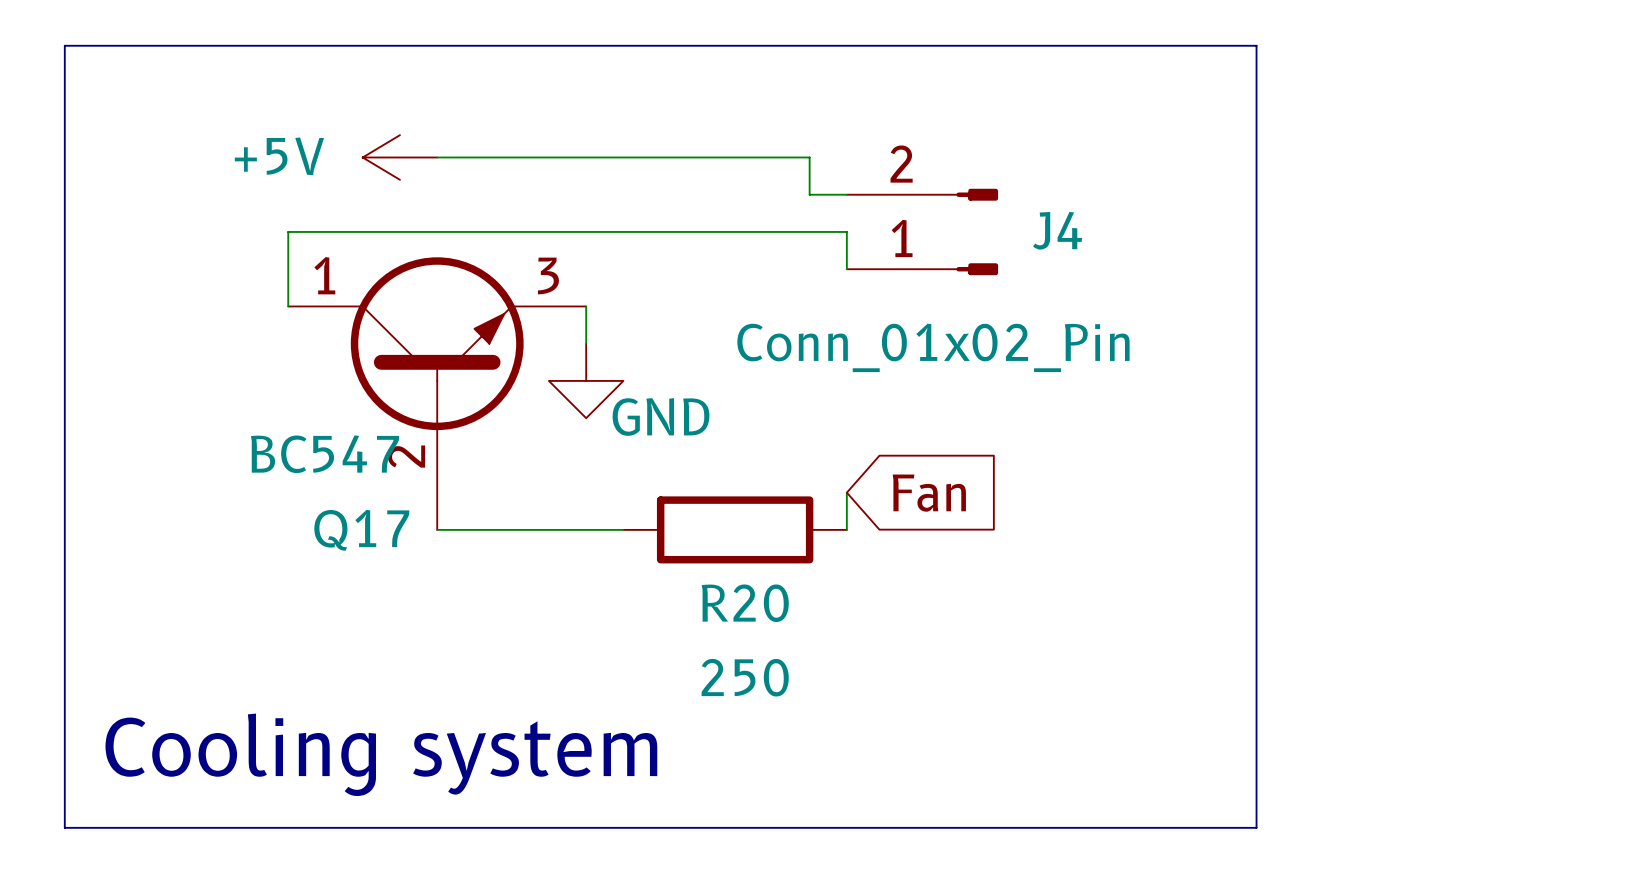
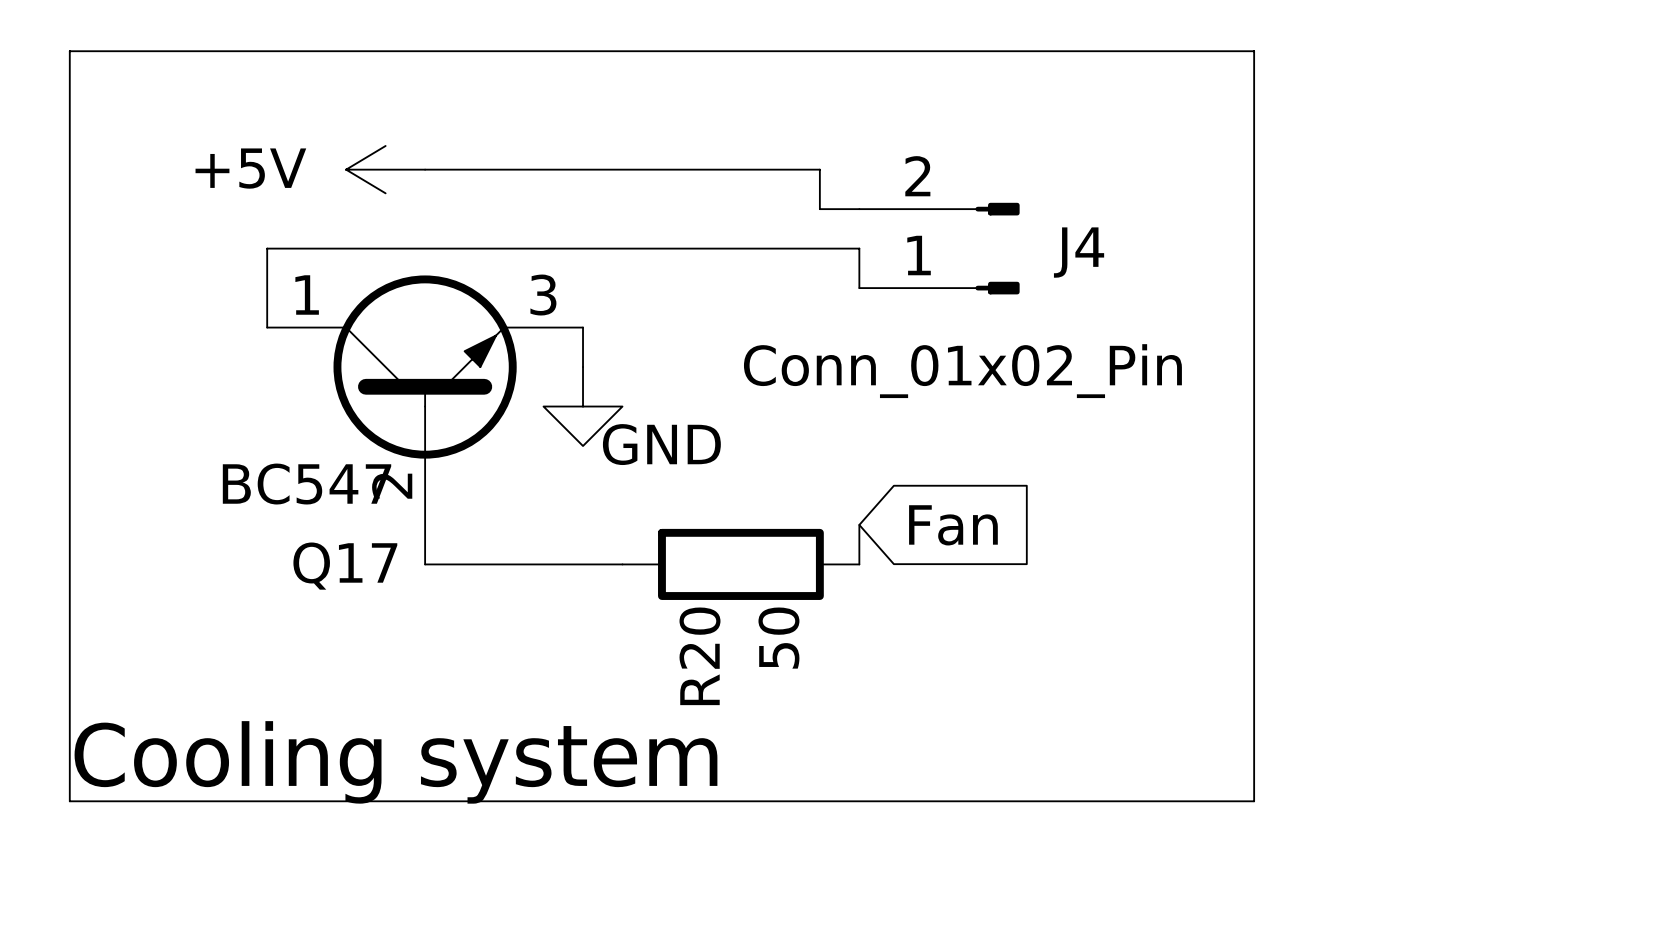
line: (102, 45) (64, 45) (64, 827) (1256, 827) (1256, 45) (1219, 45) -> (69, 51) (69, 801) (1254, 801) (1254, 51)
R20 name rotation: 0° (745, 603) -> 90° counterclockwise (700, 656)
R20 value: 250 (745, 677) -> 50 (778, 638)
text position: Cooling system (381, 754) -> Cooling system (395, 762)

